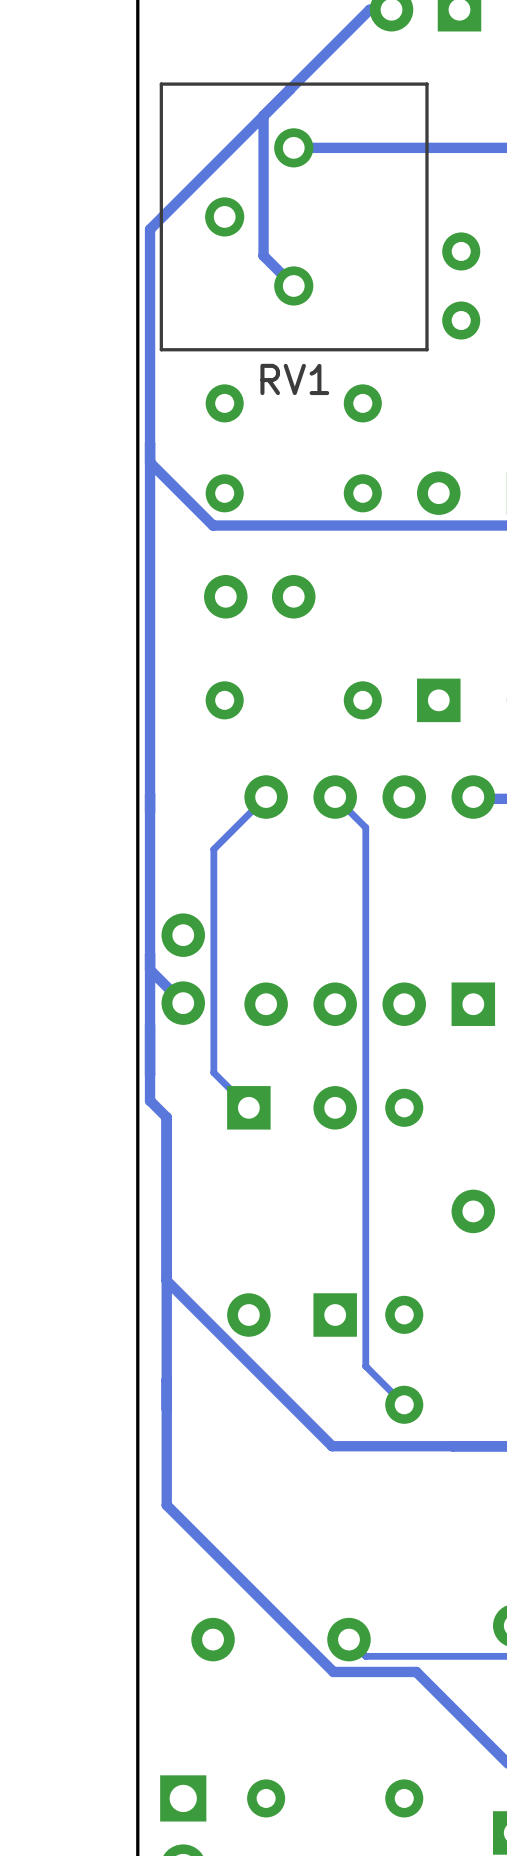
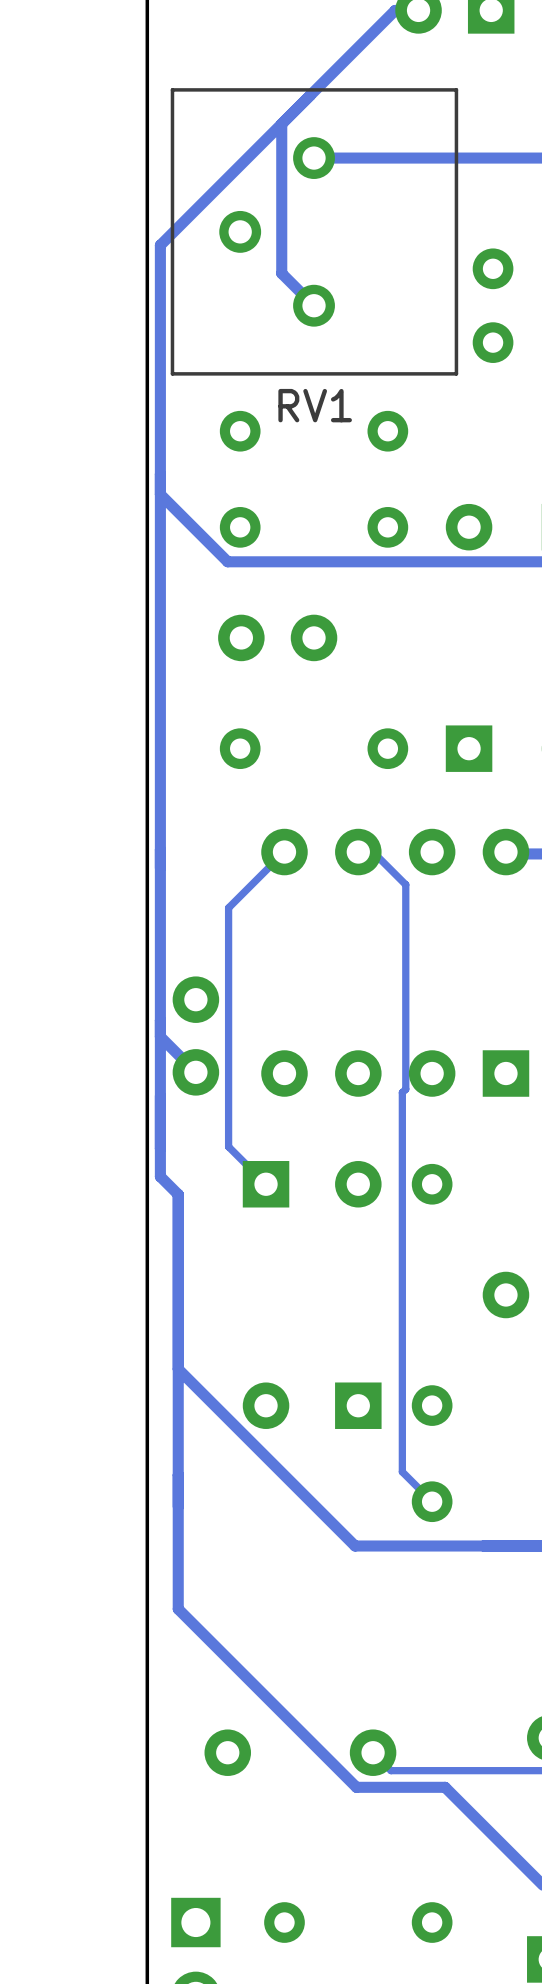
track: (335, 797) (365, 827) (365, 1366) (376, 1376) -> (373, 852) (405, 884) (405, 1089) (402, 1092) (402, 1471)

